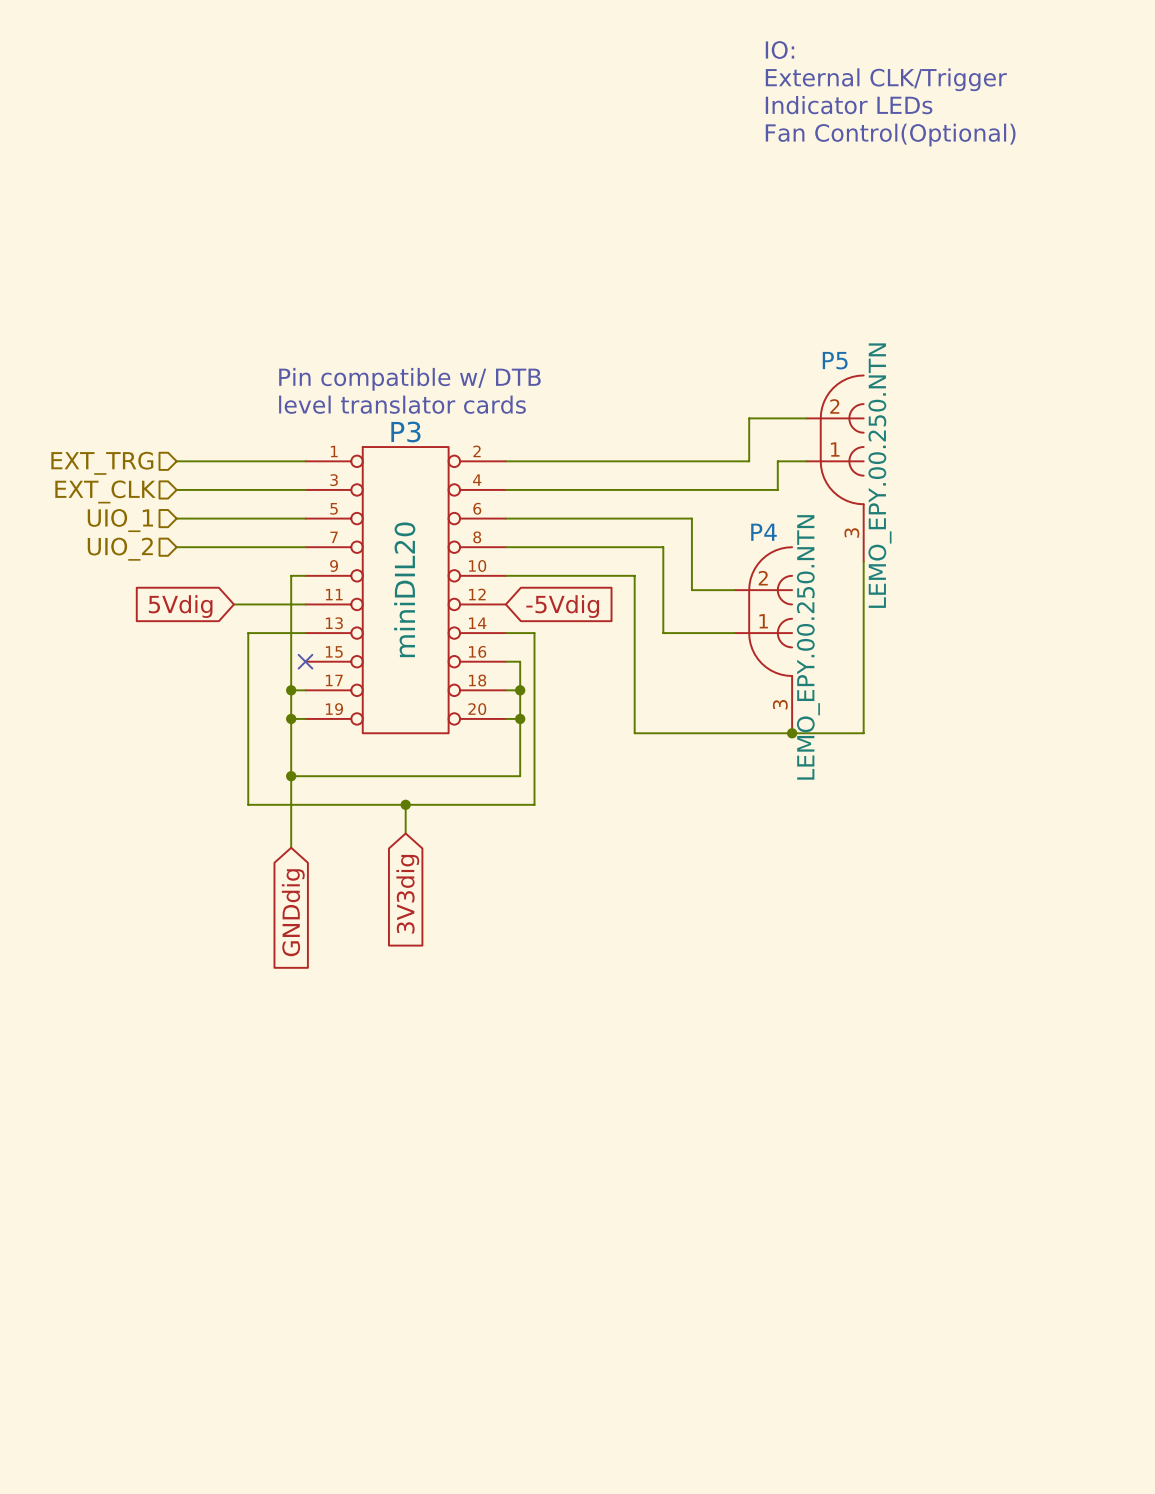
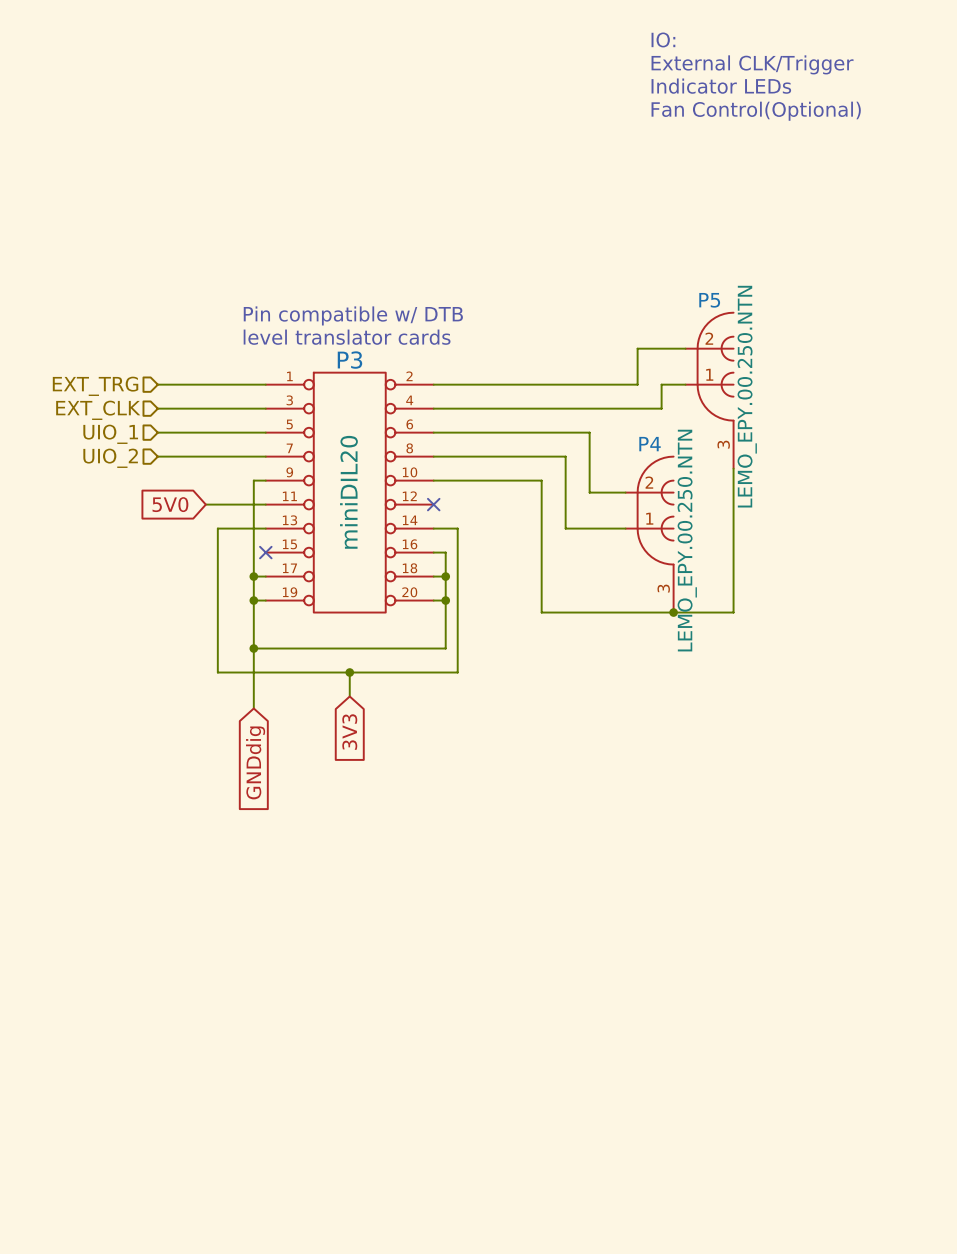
no-connect mark: none -> (433, 504)
global label: 5Vdig (180, 606) -> 5V0 (170, 504)
global label: -5Vdig (562, 606) -> none
global label: 3V3dig (407, 894) -> 3V3 (349, 732)

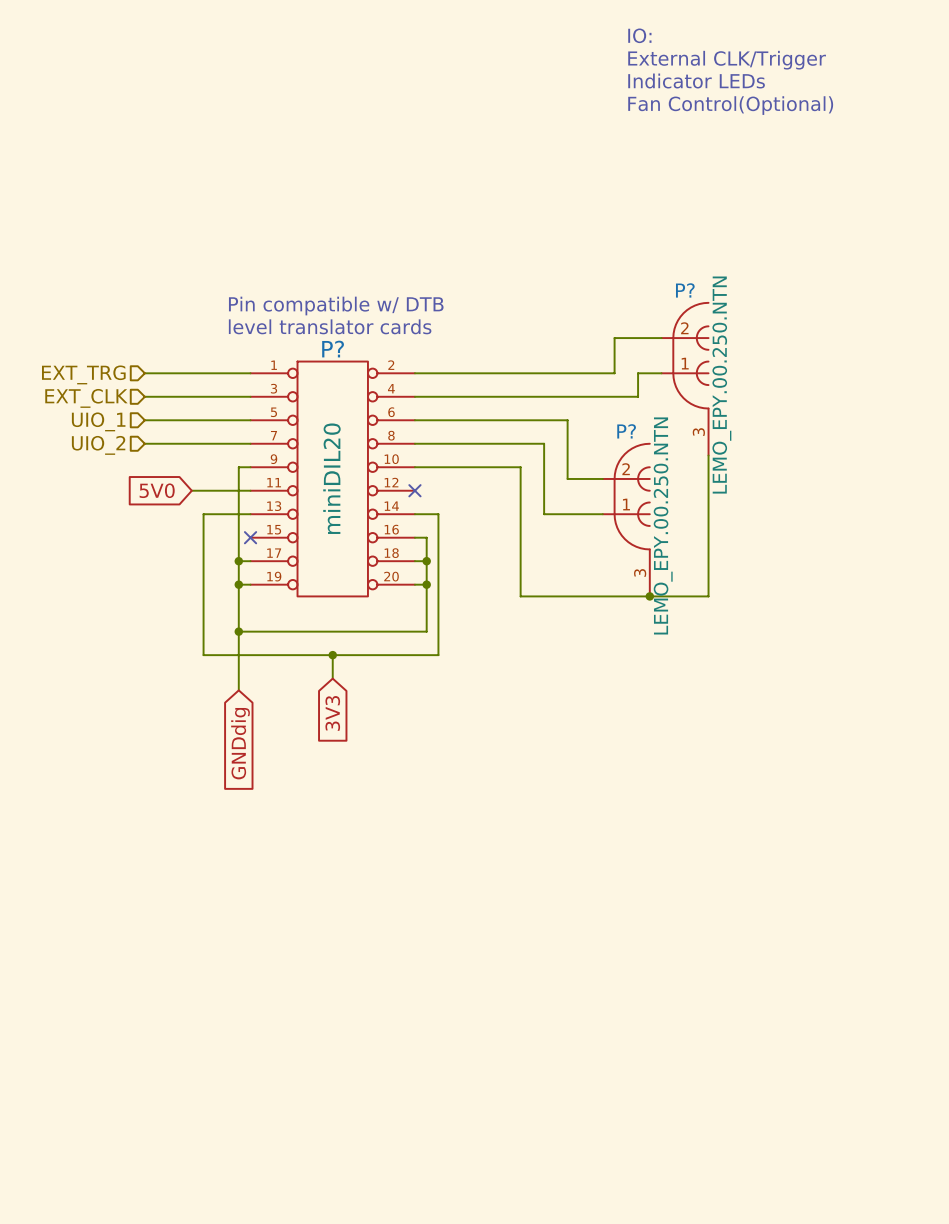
P5 name: P5 (709, 300) -> P? (685, 290)
P3 name: P3 (349, 360) -> P? (333, 349)
P4 name: P4 (650, 444) -> P? (626, 431)

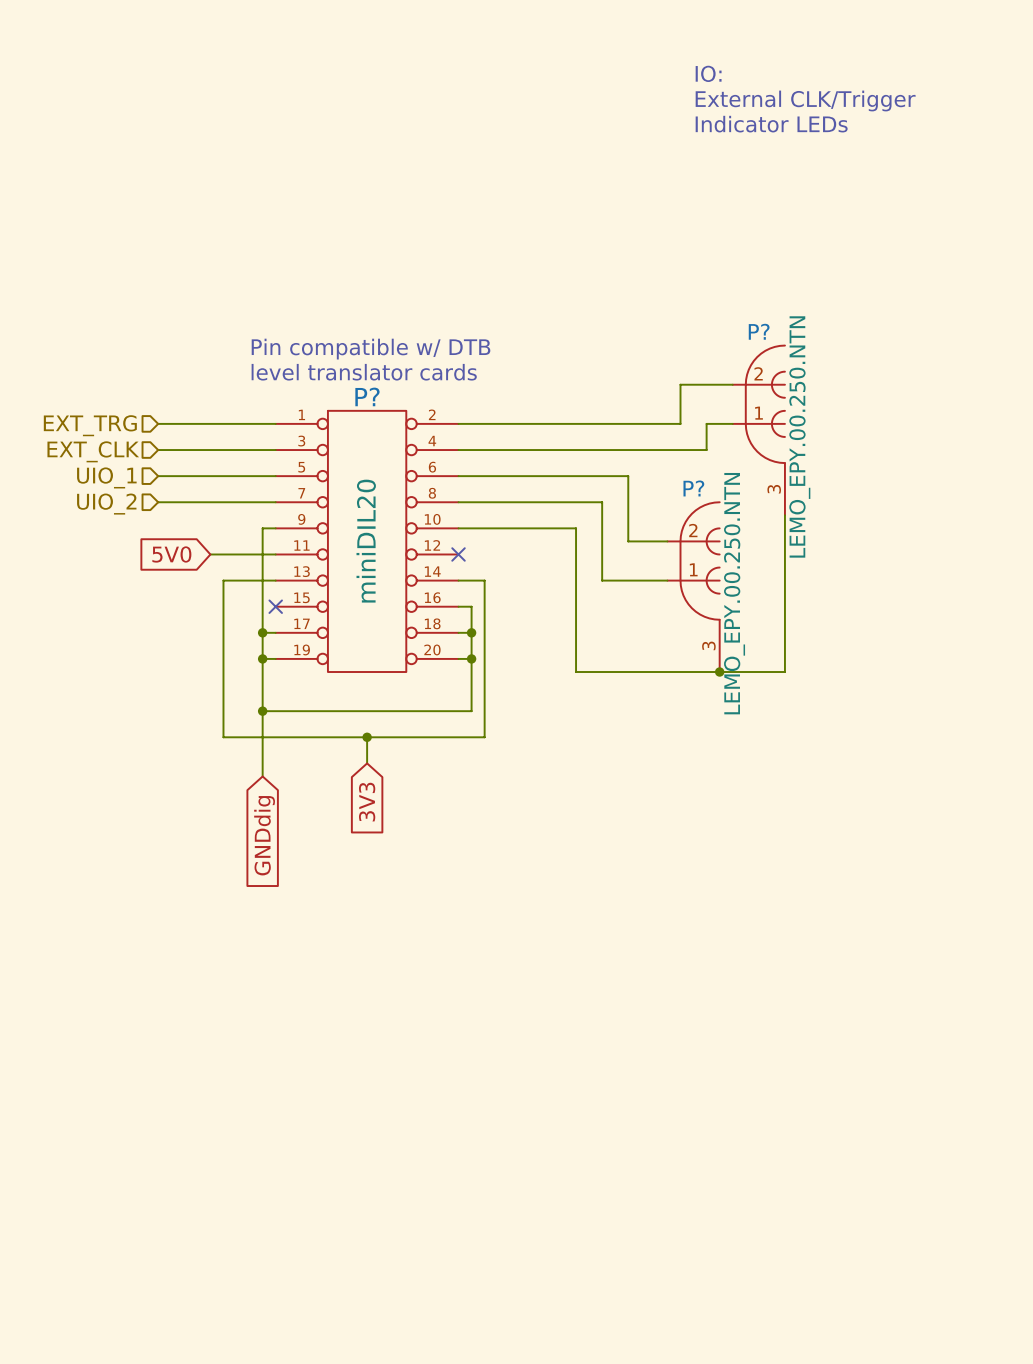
text: IO: (639, 35) -> none
text: External CLK/Trigger (727, 60) -> IO: (708, 73)
text: Indicator LEDs (696, 81) -> External CLK/Trigger (805, 100)
text: Fan Control(Optional) (730, 105) -> Indicator LEDs (771, 124)

